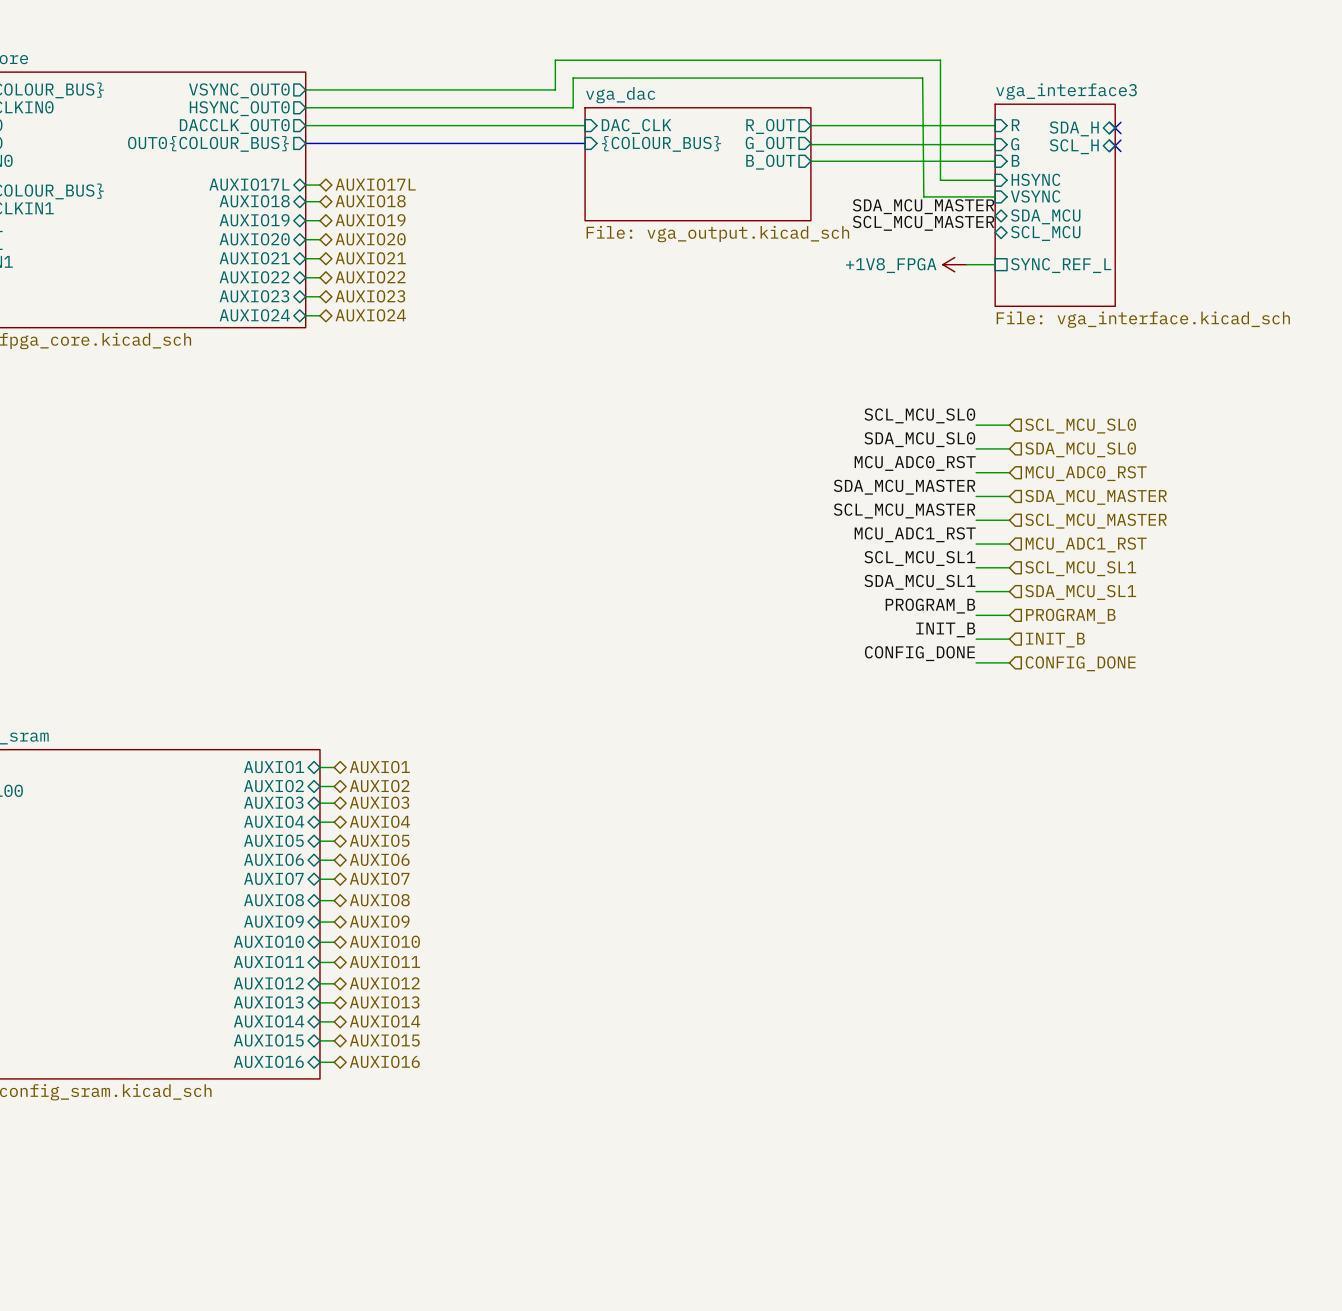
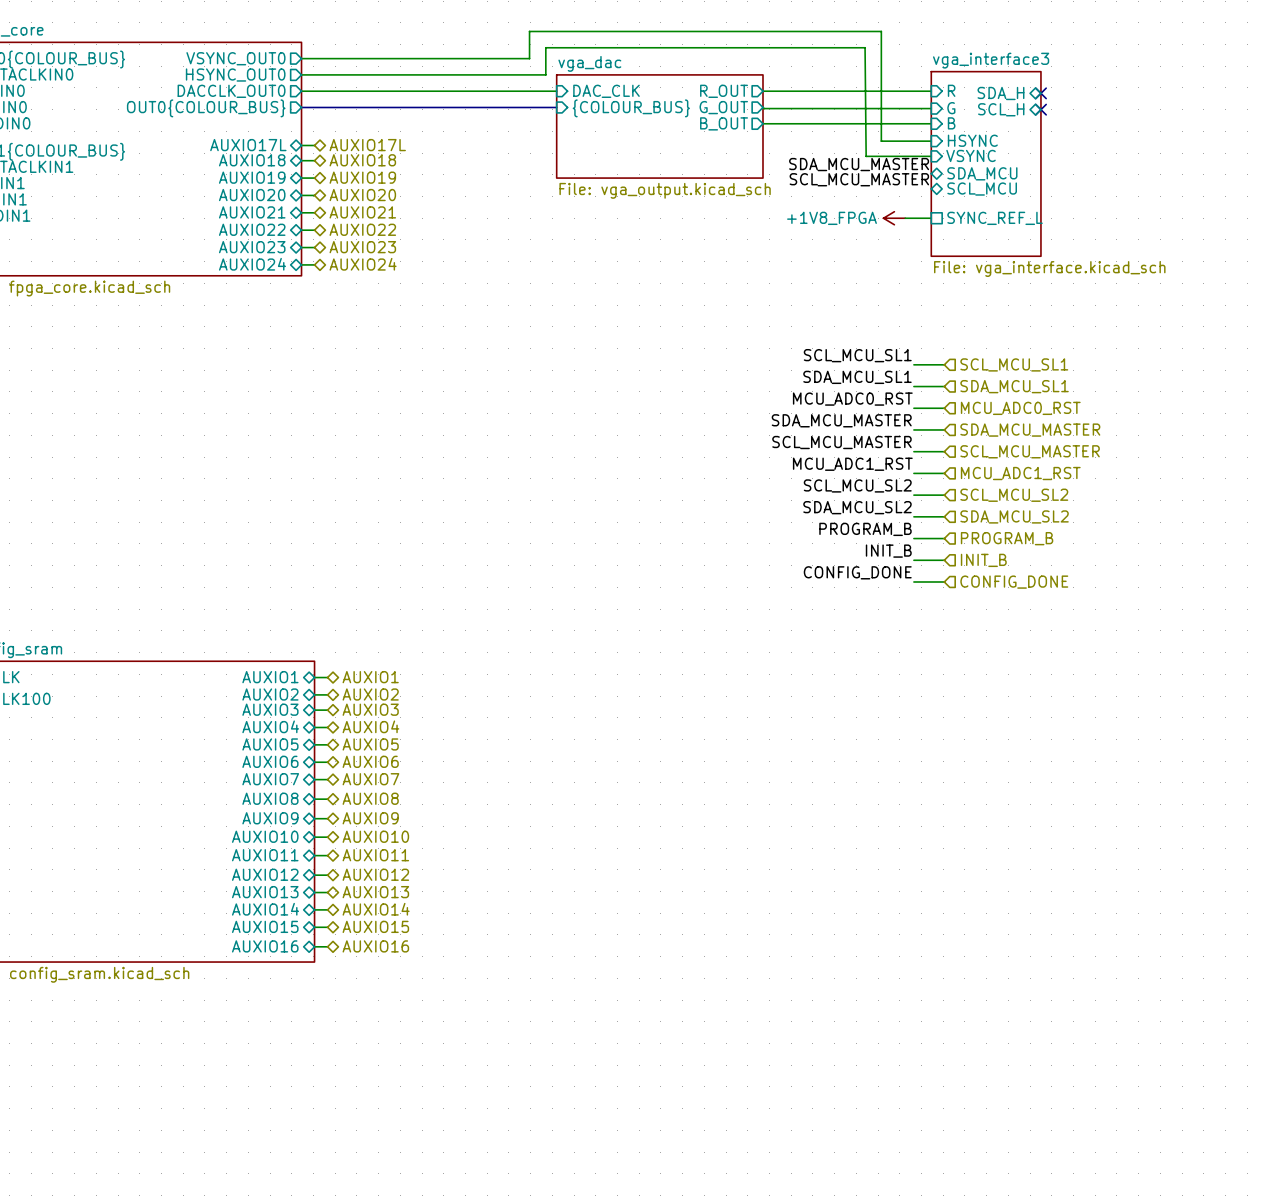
label: SCL_MCU_SL0 (919, 415) -> SCL_MCU_SL1 (857, 355)
hierarchical label: SCL_MCU_SL0 (1080, 426) -> SCL_MCU_SL1 (1014, 364)
label: SDA_MCU_SL0 (919, 439) -> SDA_MCU_SL1 (857, 377)
hierarchical label: SDA_MCU_SL0 (1080, 449) -> SDA_MCU_SL1 (1014, 386)
label: SCL_MCU_SL1 (919, 558) -> SCL_MCU_SL2 (857, 485)
hierarchical label: SCL_MCU_SL1 (1080, 568) -> SCL_MCU_SL2 (1014, 495)
label: SDA_MCU_SL1 (919, 582) -> SDA_MCU_SL2 (857, 507)
hierarchical label: SDA_MCU_SL1 (1080, 592) -> SDA_MCU_SL2 (1014, 516)

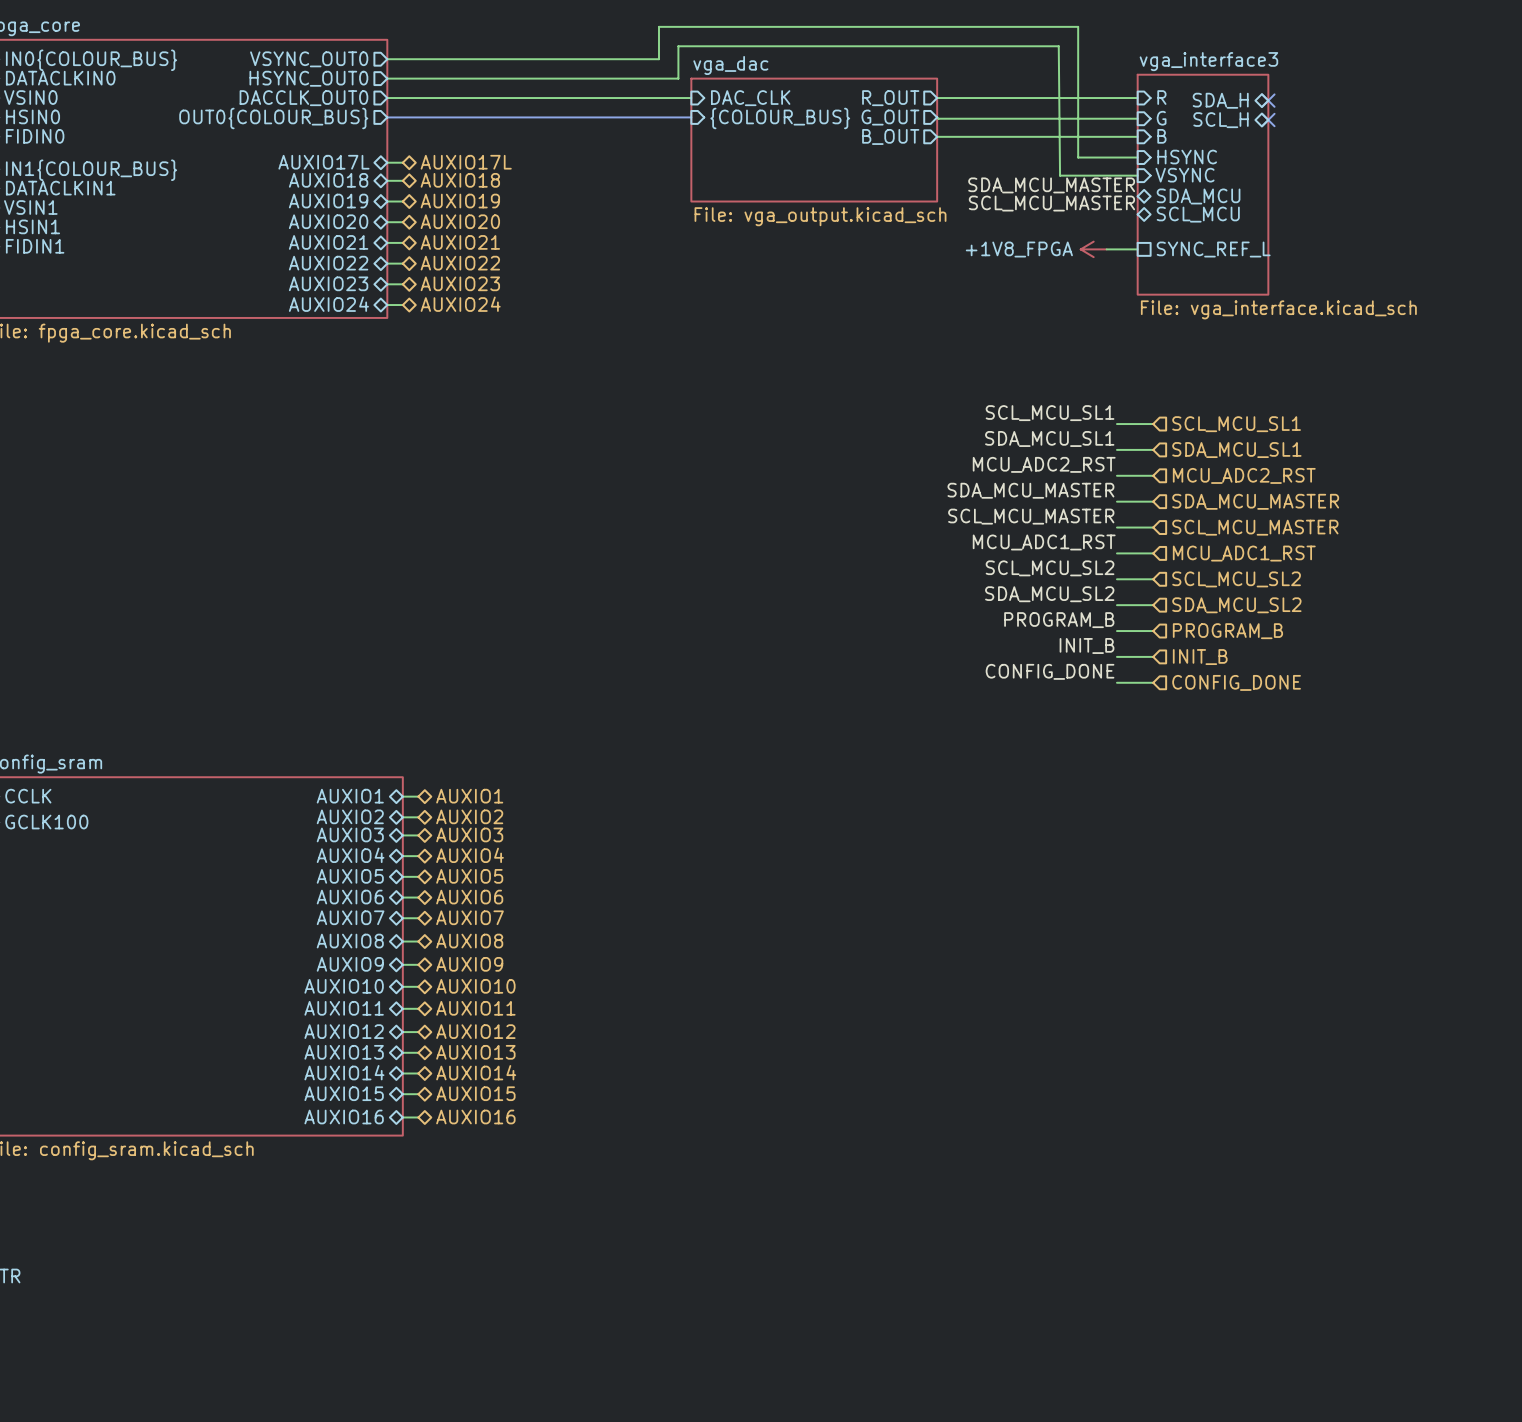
label: MCU_ADC0_RST (852, 399) -> MCU_ADC2_RST (1044, 464)
hierarchical label: MCU_ADC0_RST (1020, 408) -> MCU_ADC2_RST (1244, 475)

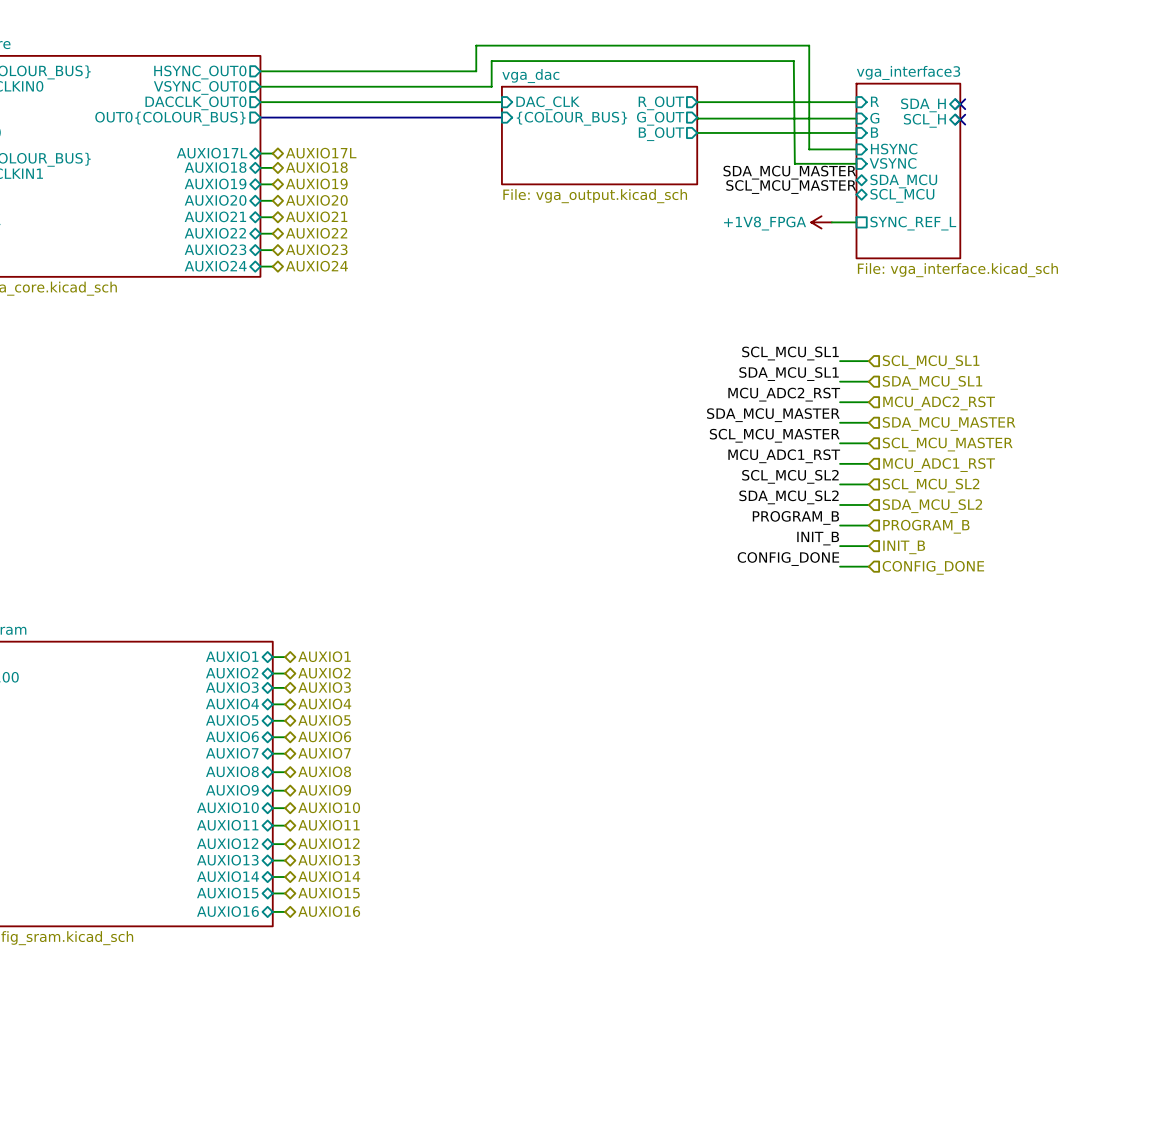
sheet pin: VSYNC_OUT0 (309, 59) -> HSYNC_OUT0 (200, 72)
sheet pin: HSYNC_OUT0 (308, 78) -> VSYNC_OUT0 (200, 87)

